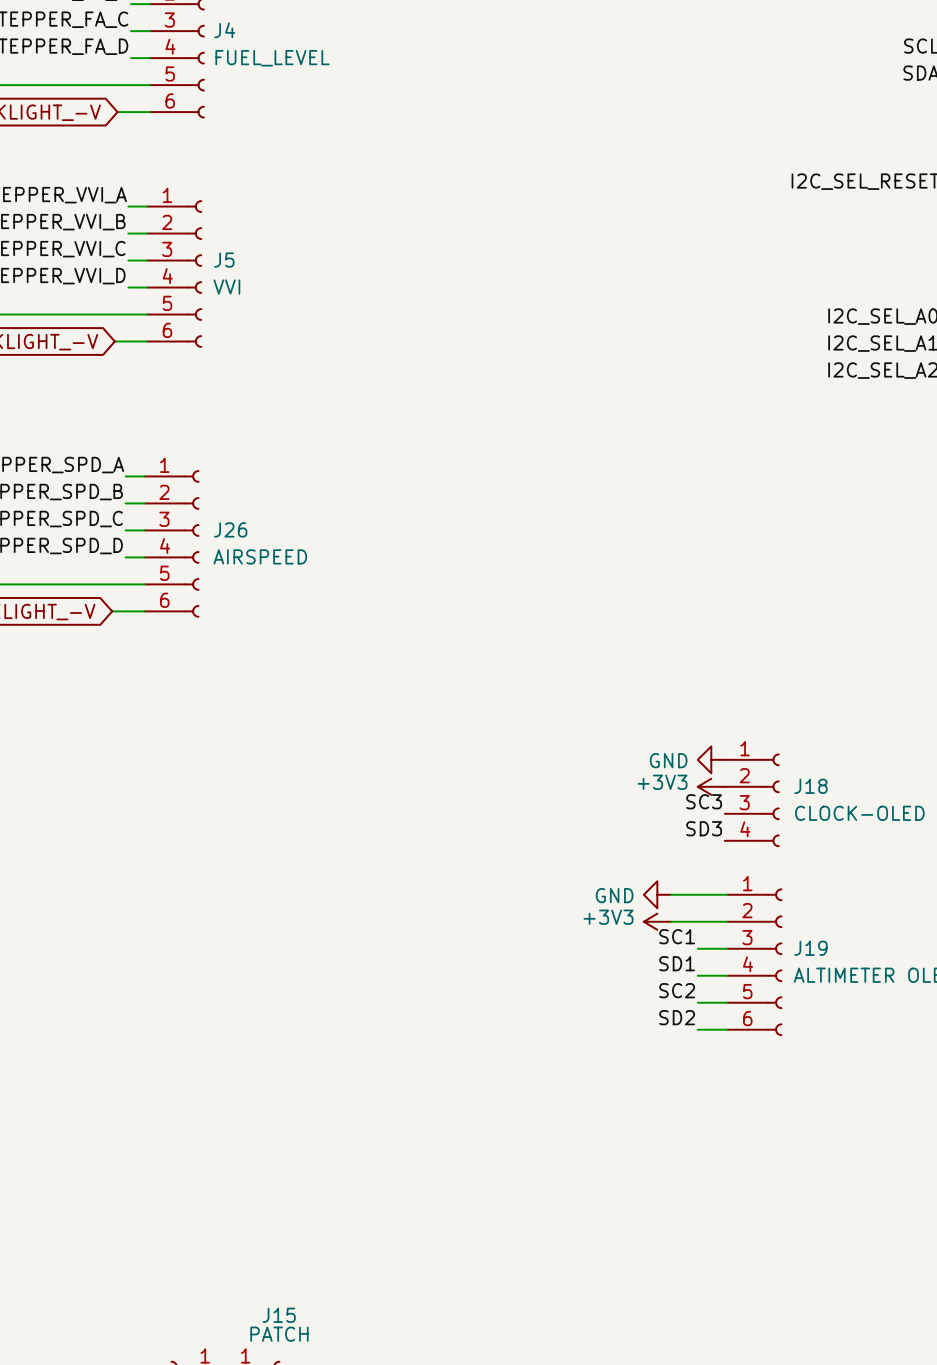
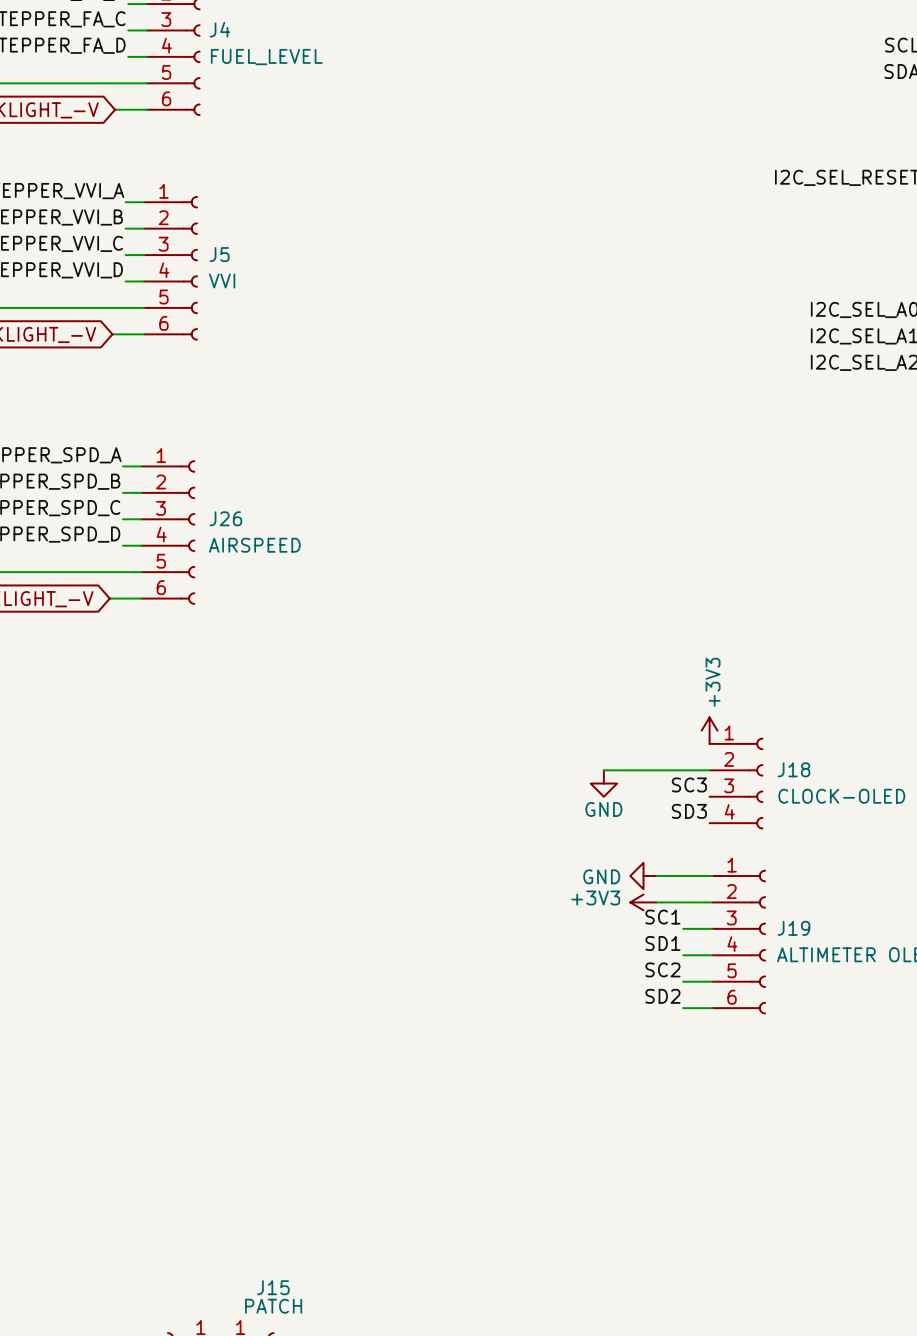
power symbol rotation: 0° (711, 759) -> 90° counterclockwise (603, 783)
power symbol position: GND (711, 759) -> GND (603, 783)
wire: none -> (603, 770) (709, 770)
power symbol rotation: 0° (711, 786) -> 90° clockwise (709, 730)
power symbol position: +3V3 (711, 786) -> +3V3 (709, 730)

